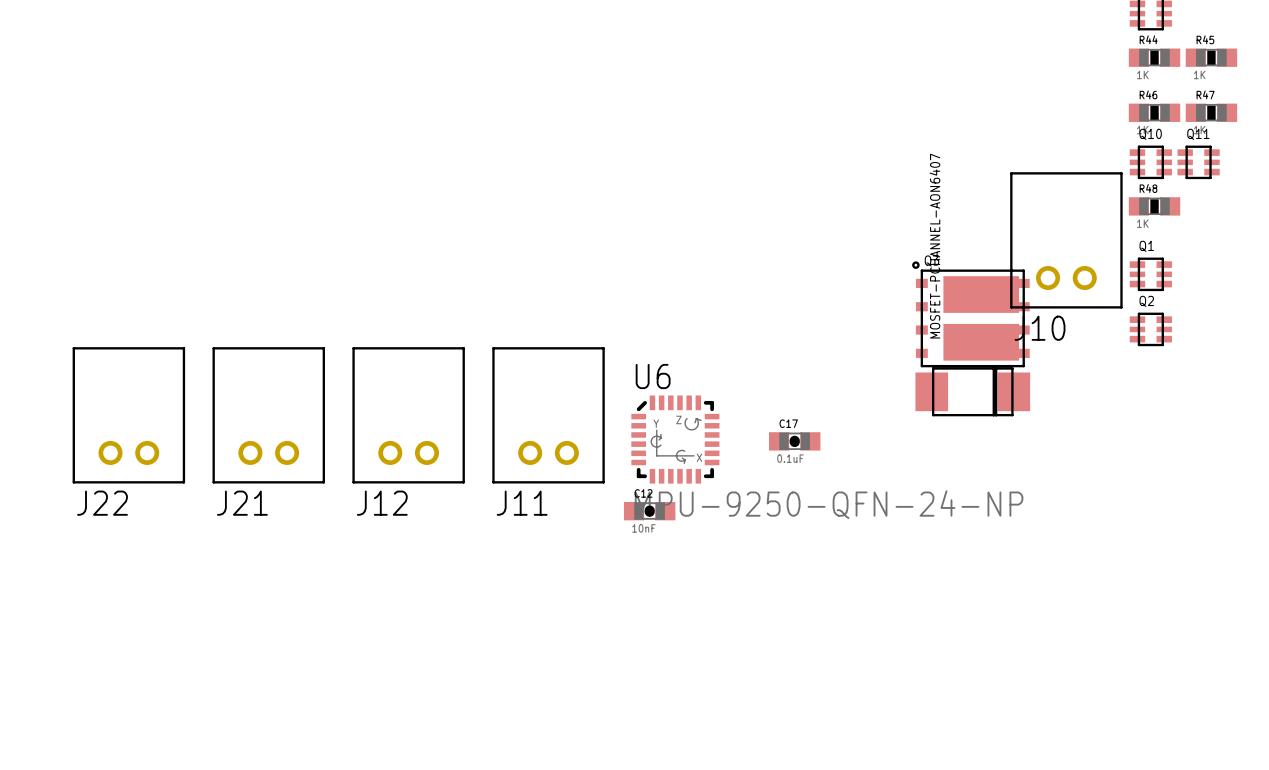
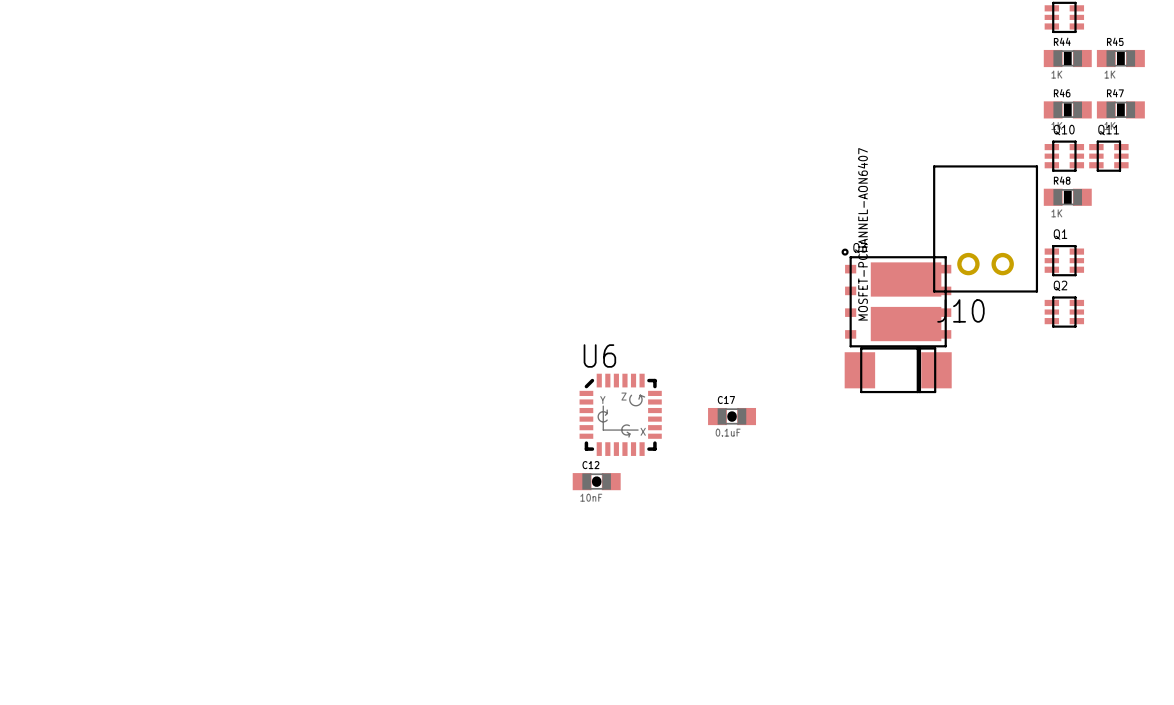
J22: (128, 415) -> none
J21: (268, 415) -> none
J12: (408, 415) -> none
J11: (548, 415) -> none
U6 value: MPU-9250-QFN-24-NP (829, 504) -> none

